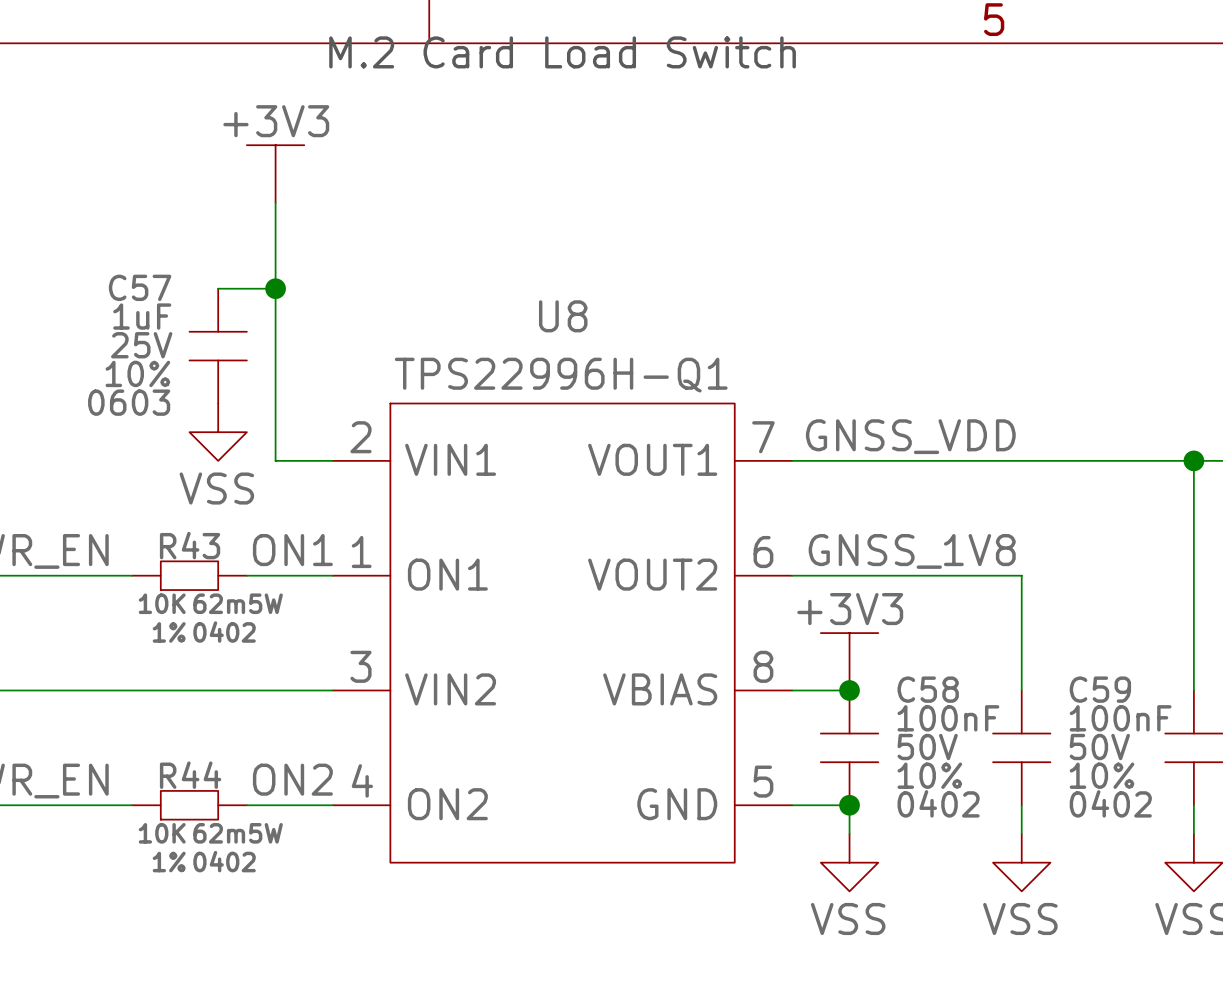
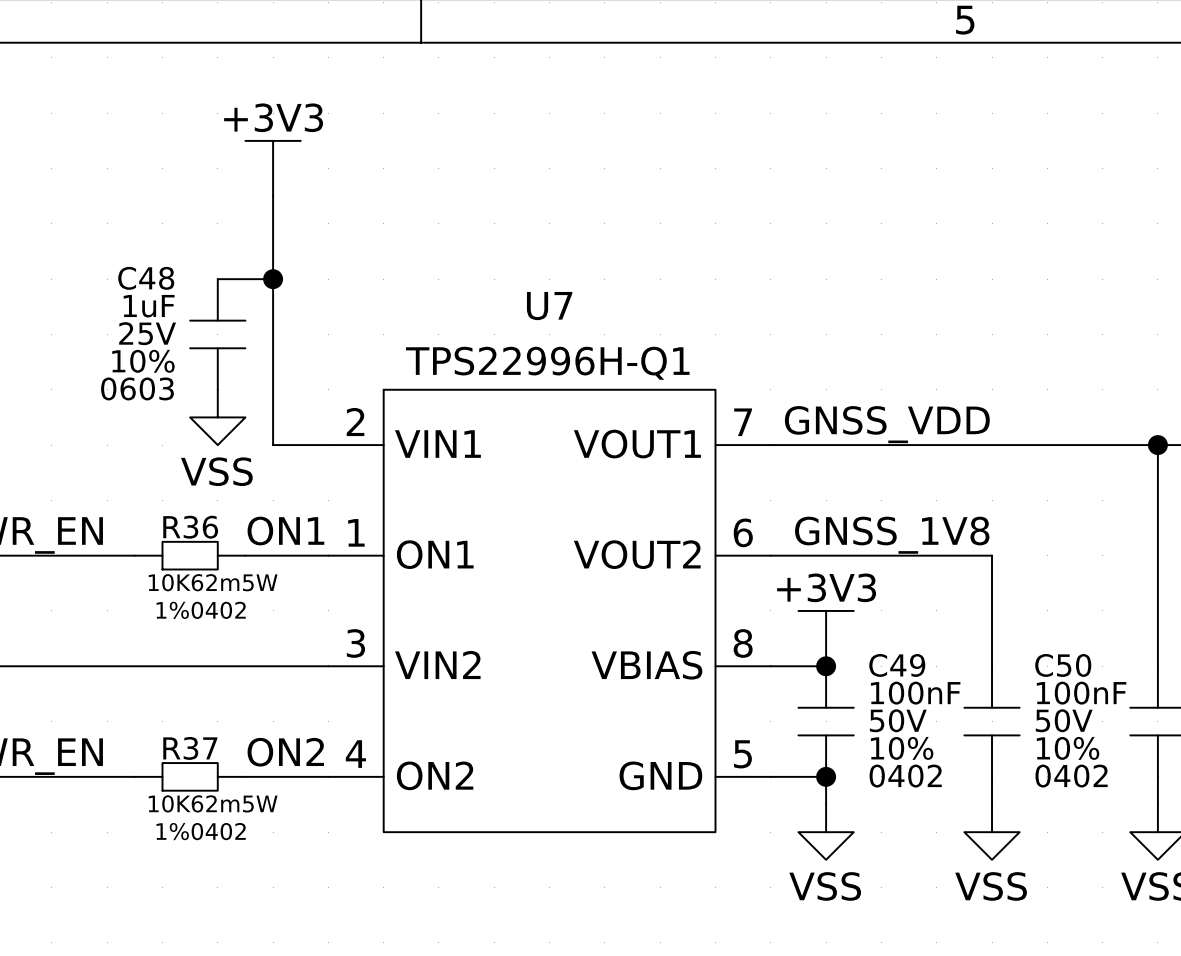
text: M.2 Card Load Switch (562, 52) -> none
C57 name: C57 (140, 287) -> C48 (146, 278)
U8 name: U8 (563, 316) -> U7 (549, 306)
R43 name: R43 (190, 545) -> R36 (190, 527)
C58 name: C58 (928, 689) -> C49 (897, 665)
C59 name: C59 (1100, 689) -> C50 (1063, 665)
R44 name: R44 (190, 775) -> R37 (190, 748)

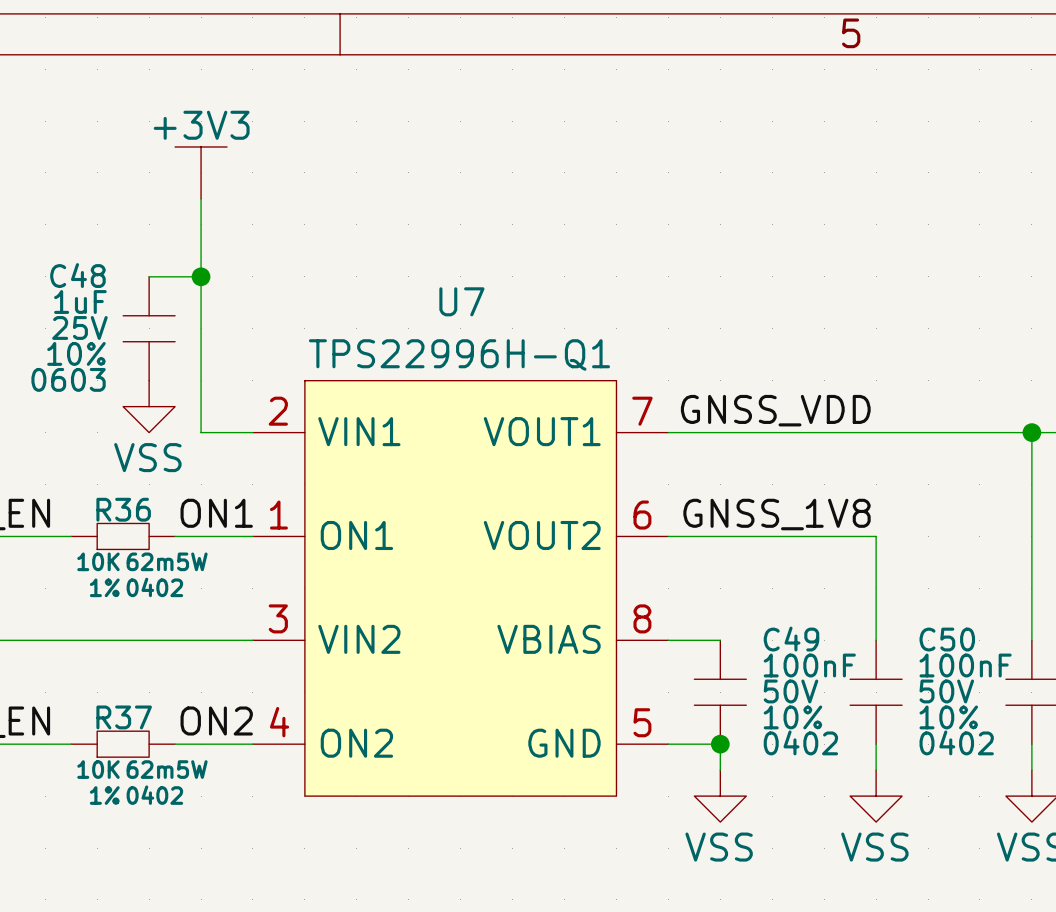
power symbol: +3V3 (826, 638) -> none
junction: (826, 666) -> none

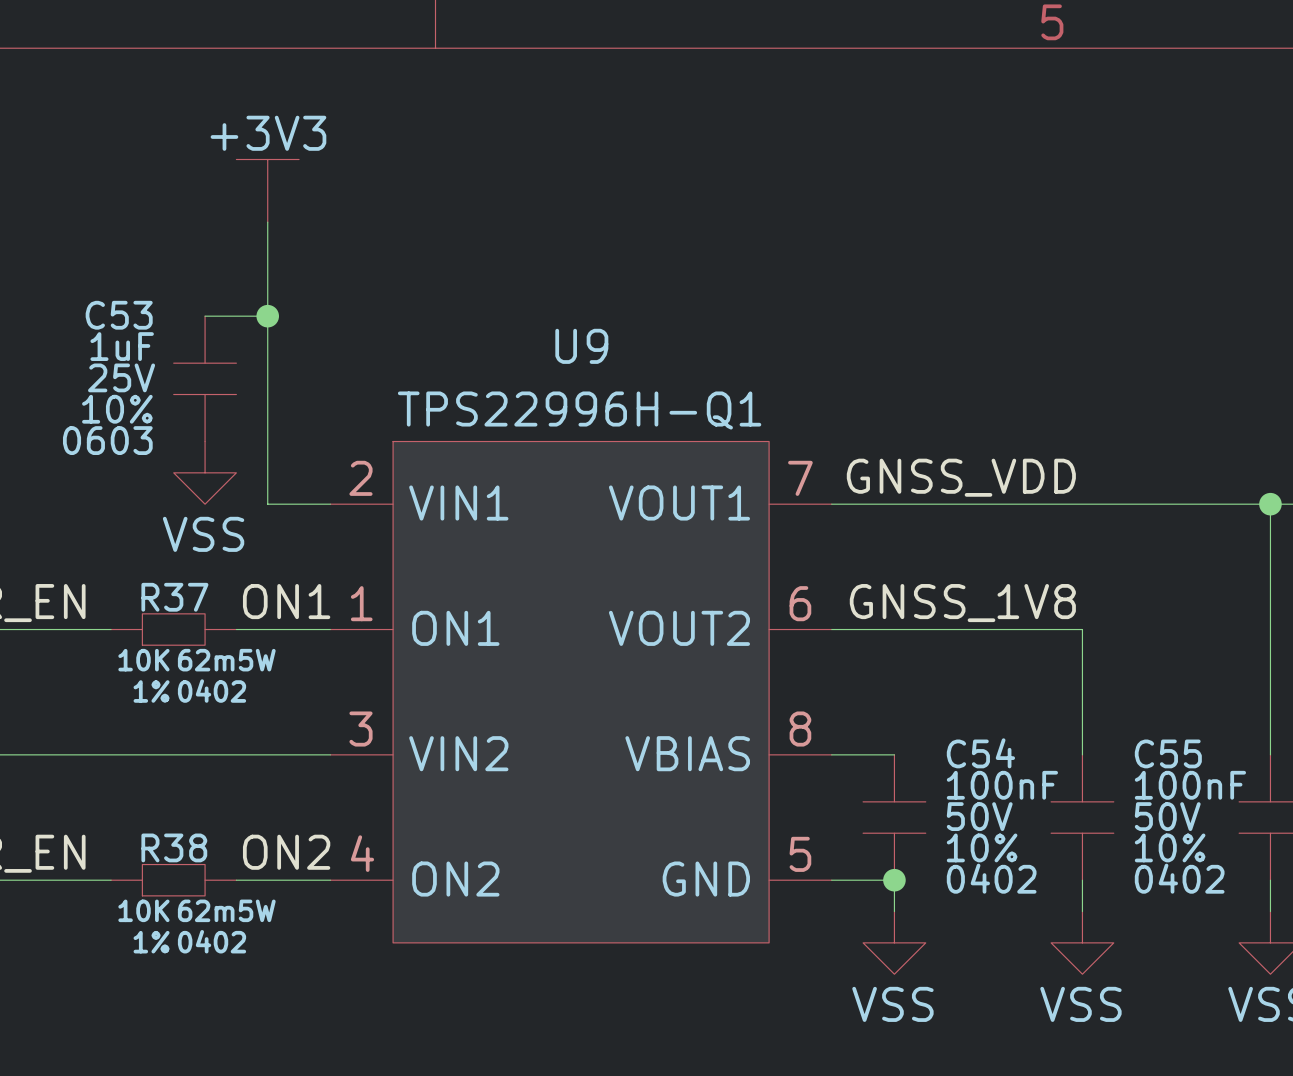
C48 name: C48 (77, 275) -> C53 (119, 315)
U7 name: U7 (461, 301) -> U9 (581, 346)
R36 name: R36 (123, 509) -> R37 (174, 597)
C49 name: C49 (791, 639) -> C54 (980, 753)
C50 name: C50 (947, 639) -> C55 (1168, 753)
R37 name: R37 (124, 717) -> R38 (174, 847)

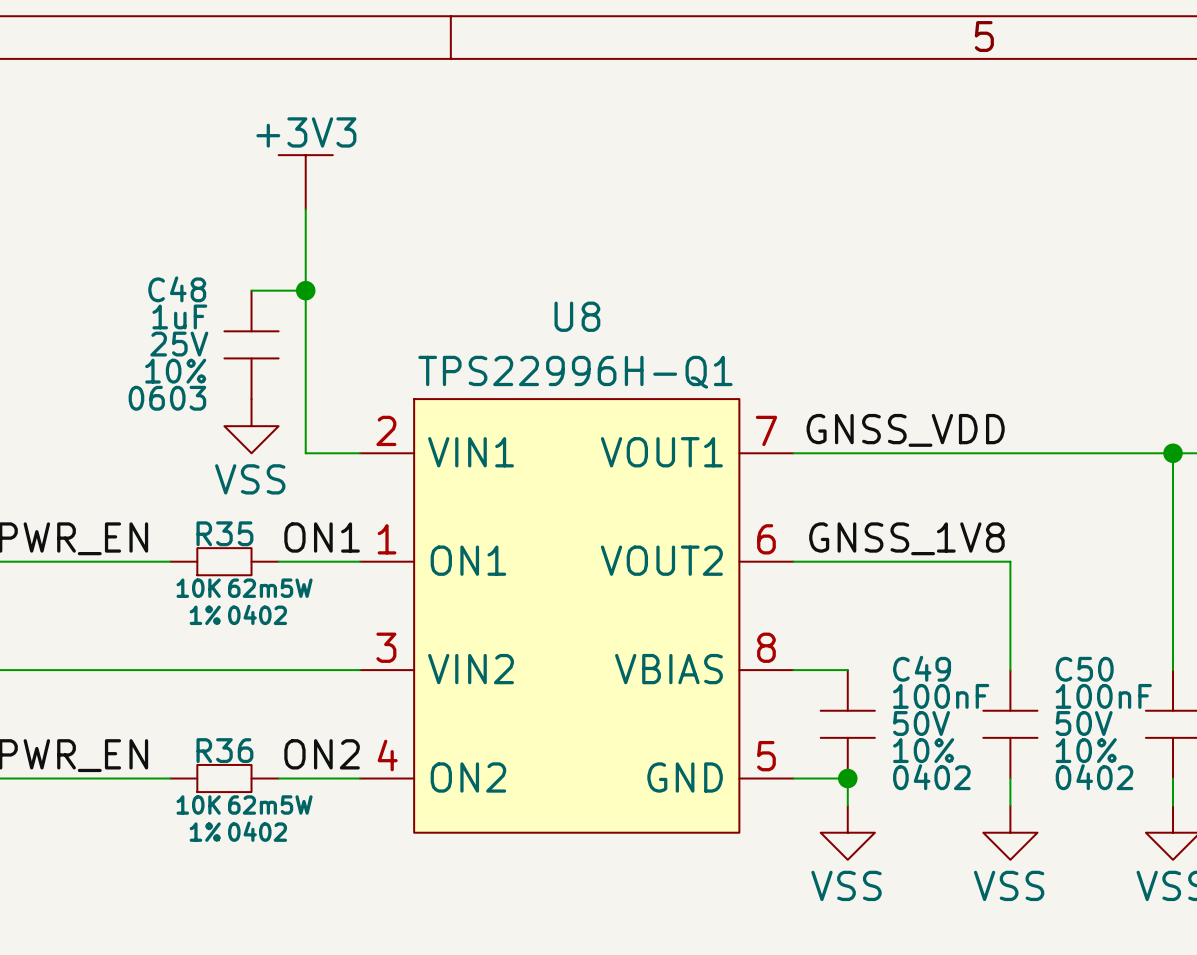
C53 name: C53 (119, 315) -> C48 (177, 289)
U9 name: U9 (581, 346) -> U8 (577, 316)
R37 name: R37 (174, 597) -> R35 (224, 533)
C54 name: C54 (980, 753) -> C49 (922, 668)
C55 name: C55 (1168, 753) -> C50 (1084, 669)
R38 name: R38 (174, 847) -> R36 (224, 750)

